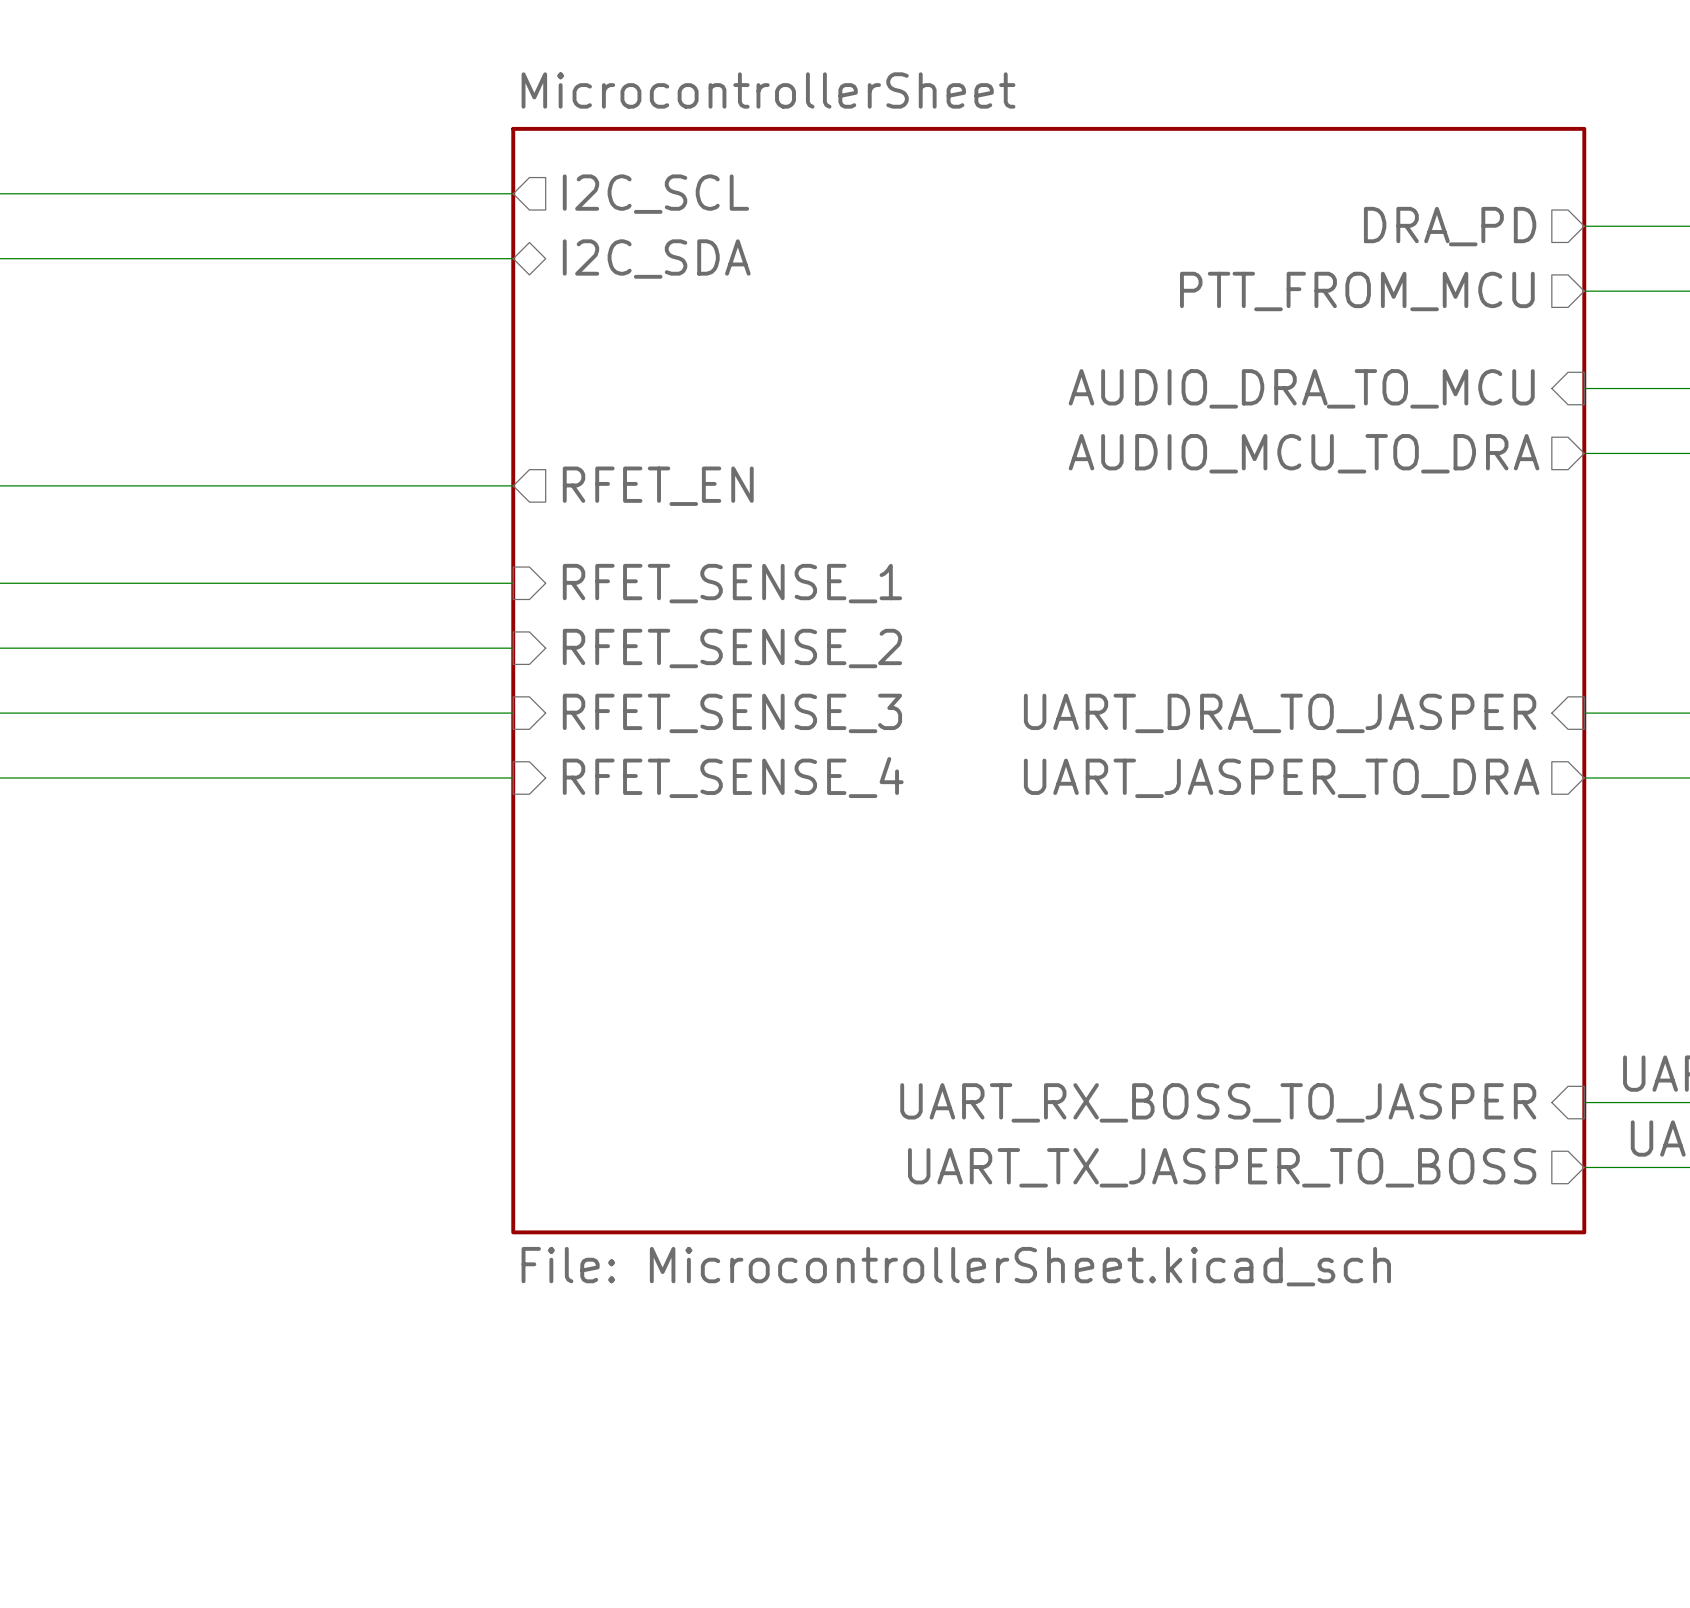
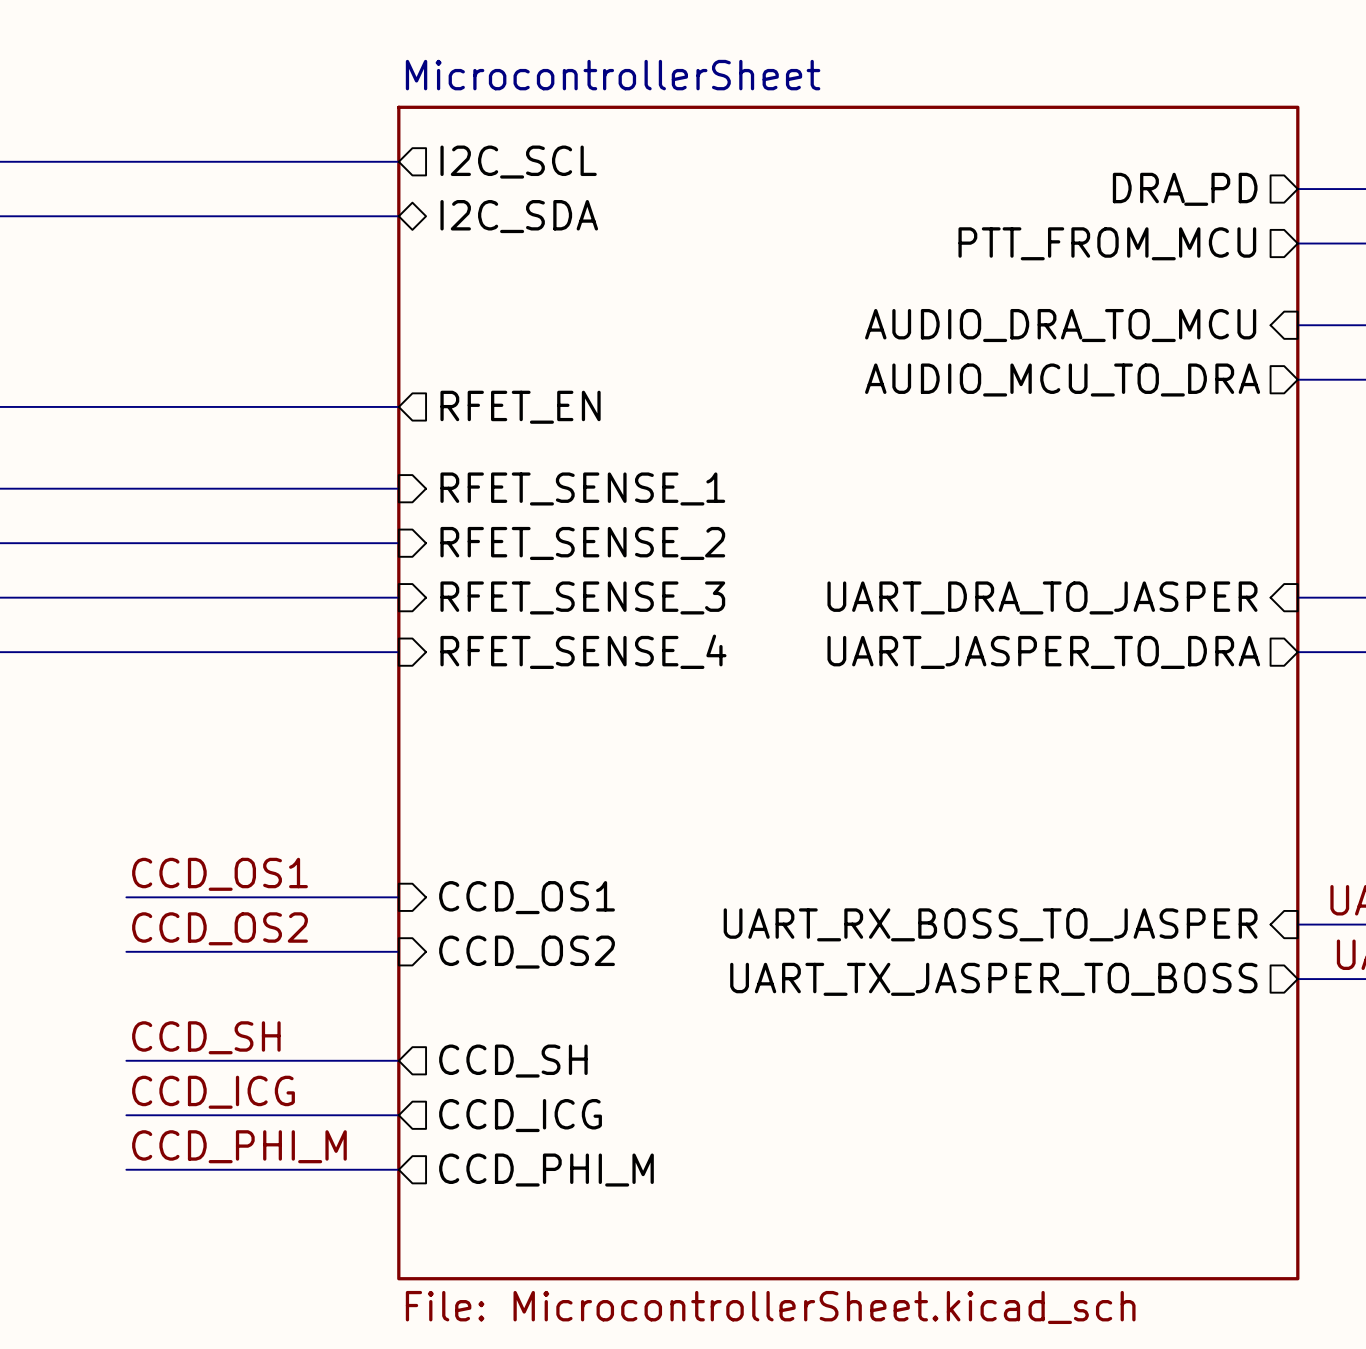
sheet MicrocontrollerSheet: File: MicrocontrollerSheet.kicad_sch (1048, 680) -> none
sheet MicrocontrollerSheet: none -> File: MicrocontrollerSheet.kicad_sch (848, 693)
label: none -> CCD_OS1 (220, 874)
wire: none -> (126, 897) (398, 897)
sheet pin: none -> CCD_OS1 (527, 897)
label: none -> CCD_OS2 (220, 928)
wire: none -> (126, 951) (398, 951)
sheet pin: none -> CCD_OS2 (527, 952)
label: none -> CCD_SH (206, 1037)
wire: none -> (126, 1060) (398, 1060)
sheet pin: none -> CCD_SH (513, 1061)
label: none -> CCD_ICG (213, 1092)
wire: none -> (126, 1115) (398, 1115)
sheet pin: none -> CCD_ICG (520, 1115)
label: none -> CCD_PHI_M (239, 1146)
wire: none -> (126, 1169) (398, 1169)
sheet pin: none -> CCD_PHI_M (546, 1170)

